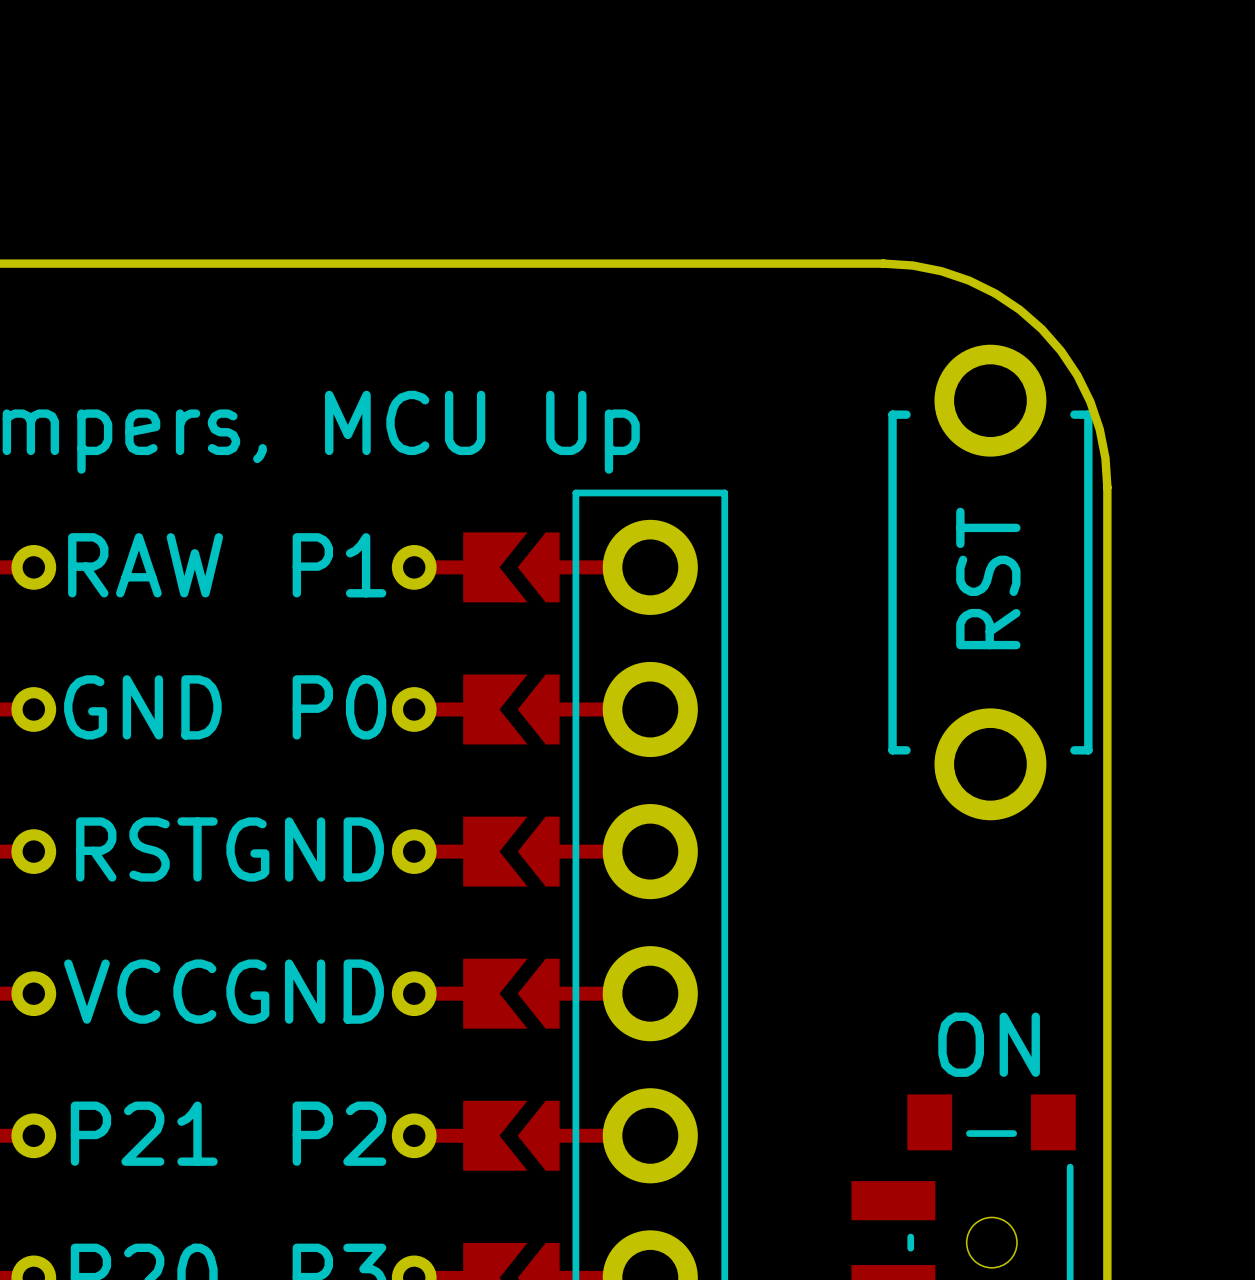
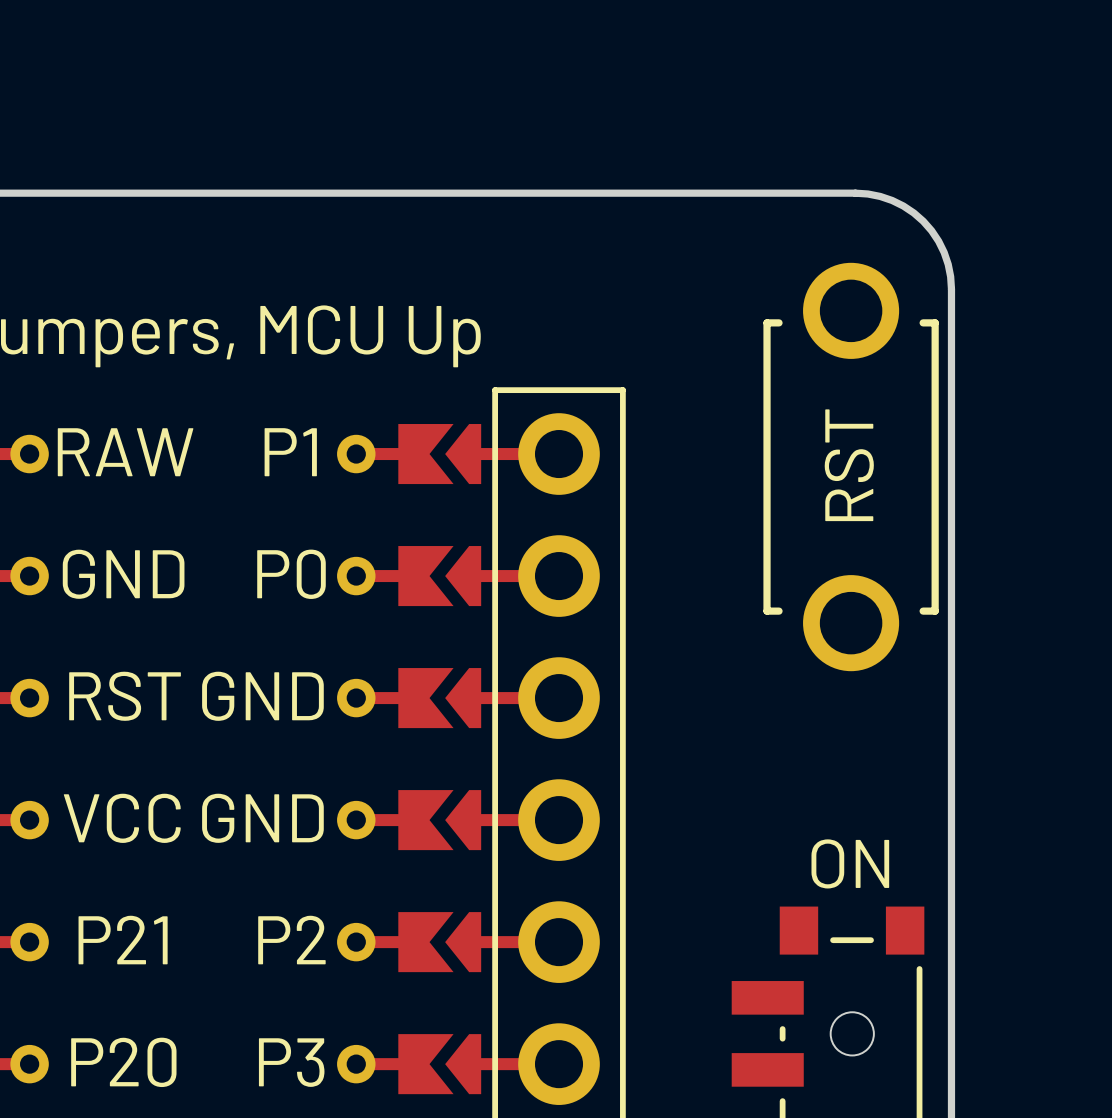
board edge: (883, 263) (912, 265) (941, 271) (969, 280) (995, 293) (1019, 309) (1041, 329) (1061, 351) (1077, 375) (1090, 401) (1099, 429) (1105, 458) (1107, 487) -> (759, 193) (867, 193) (880, 196) (903, 206) (923, 221) (931, 230) (944, 252) (950, 276) (951, 385)

